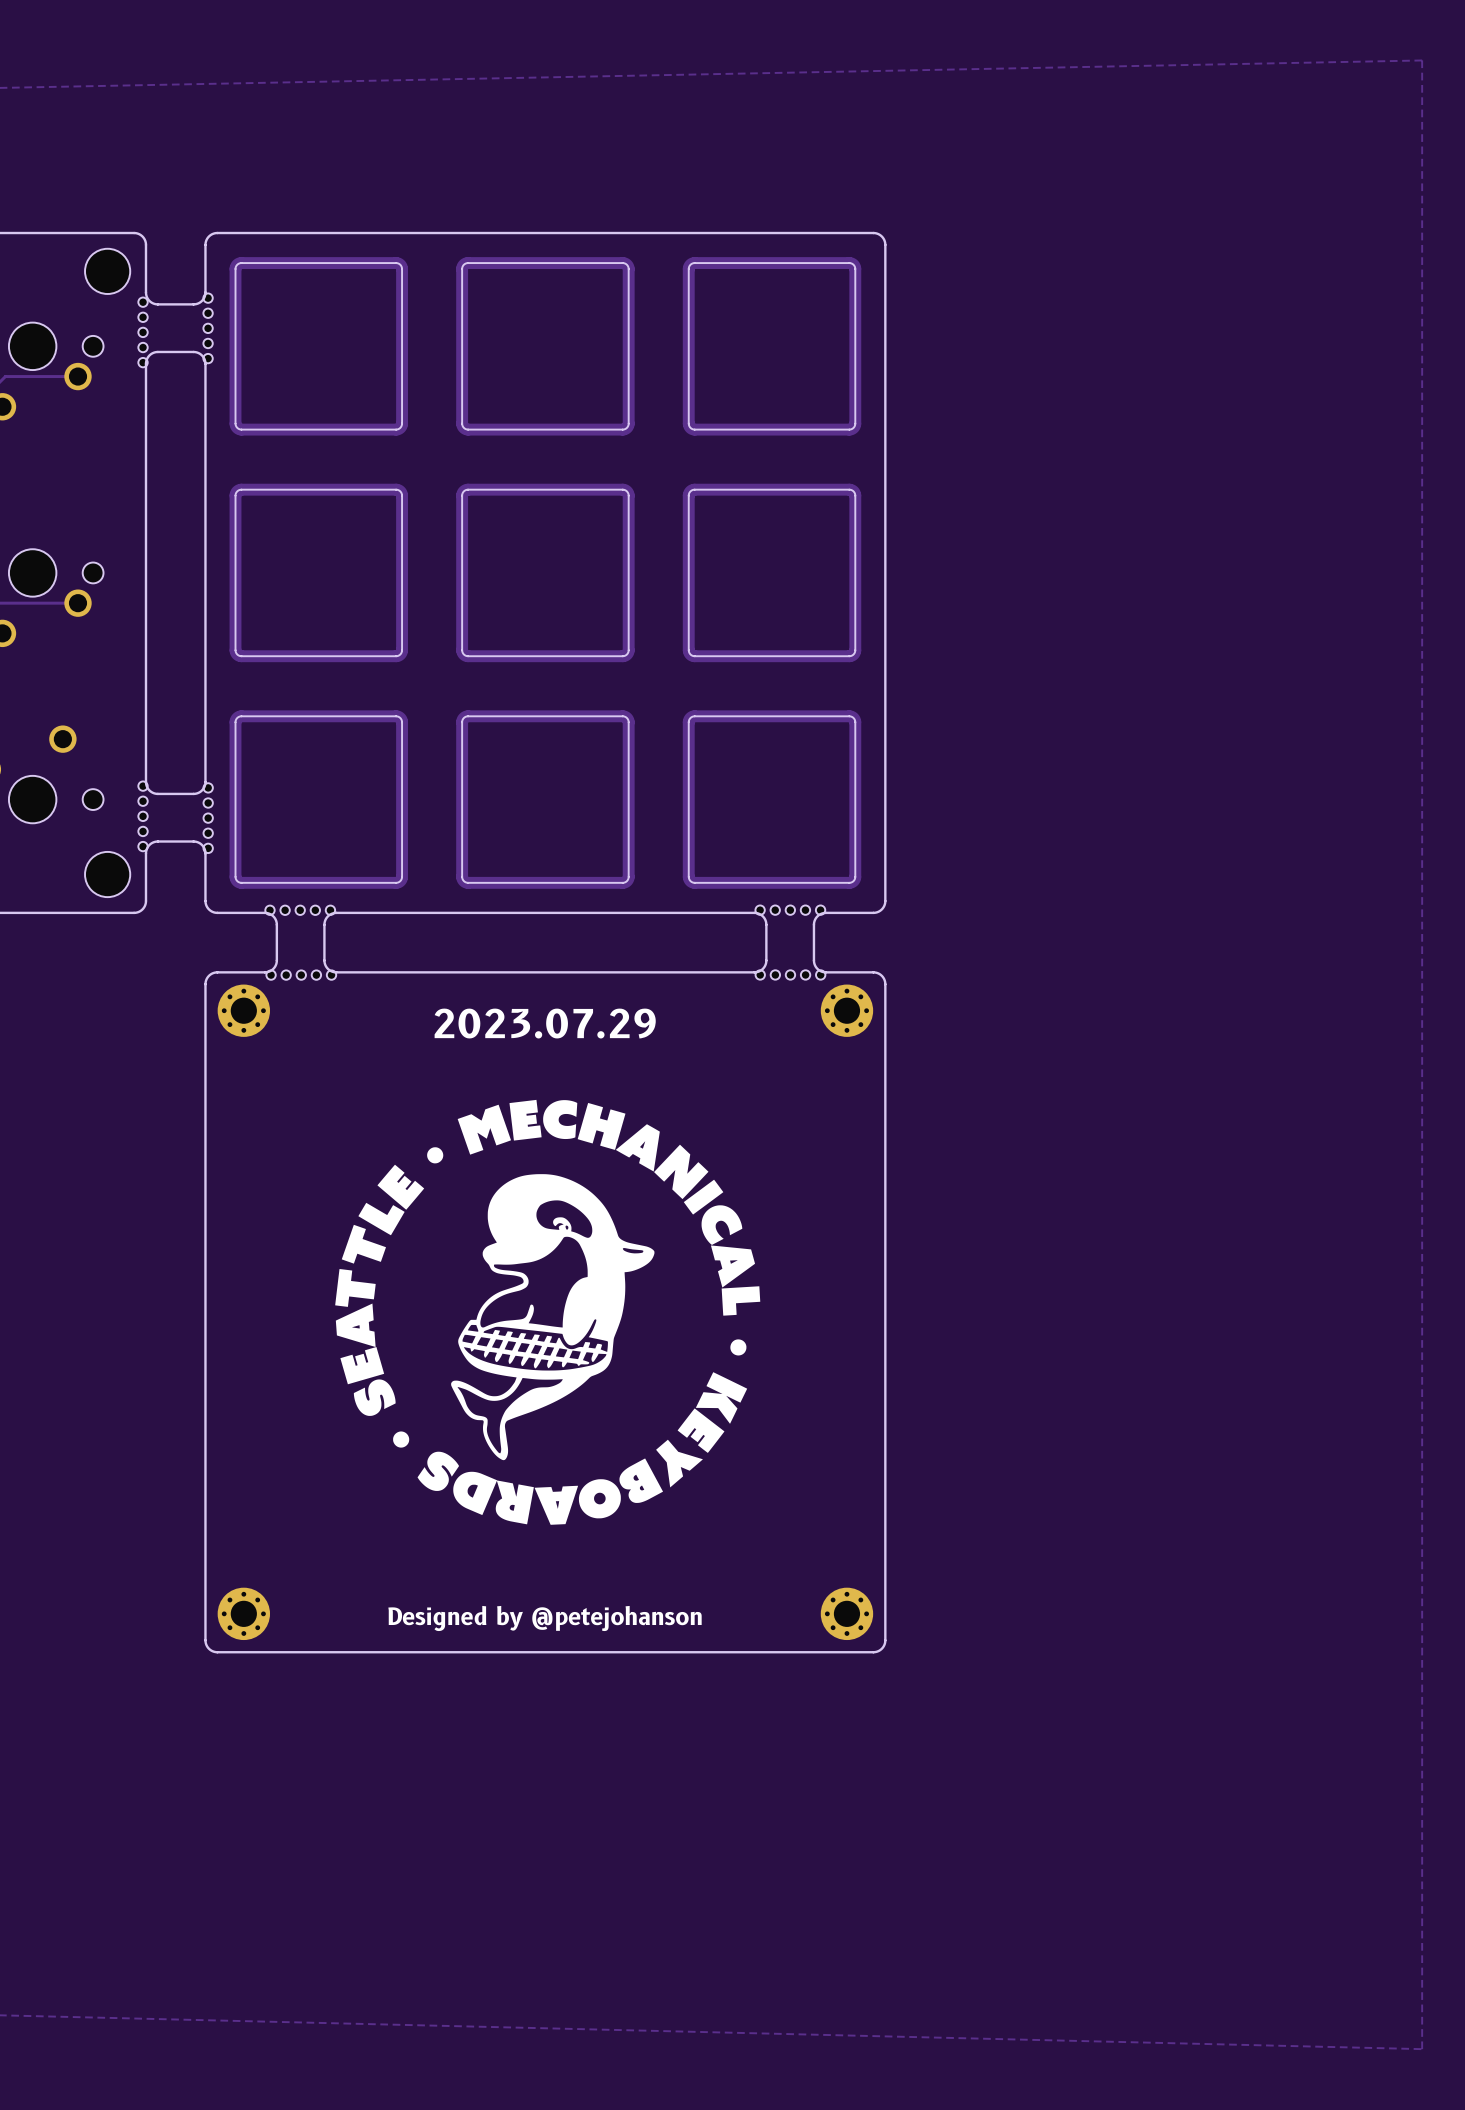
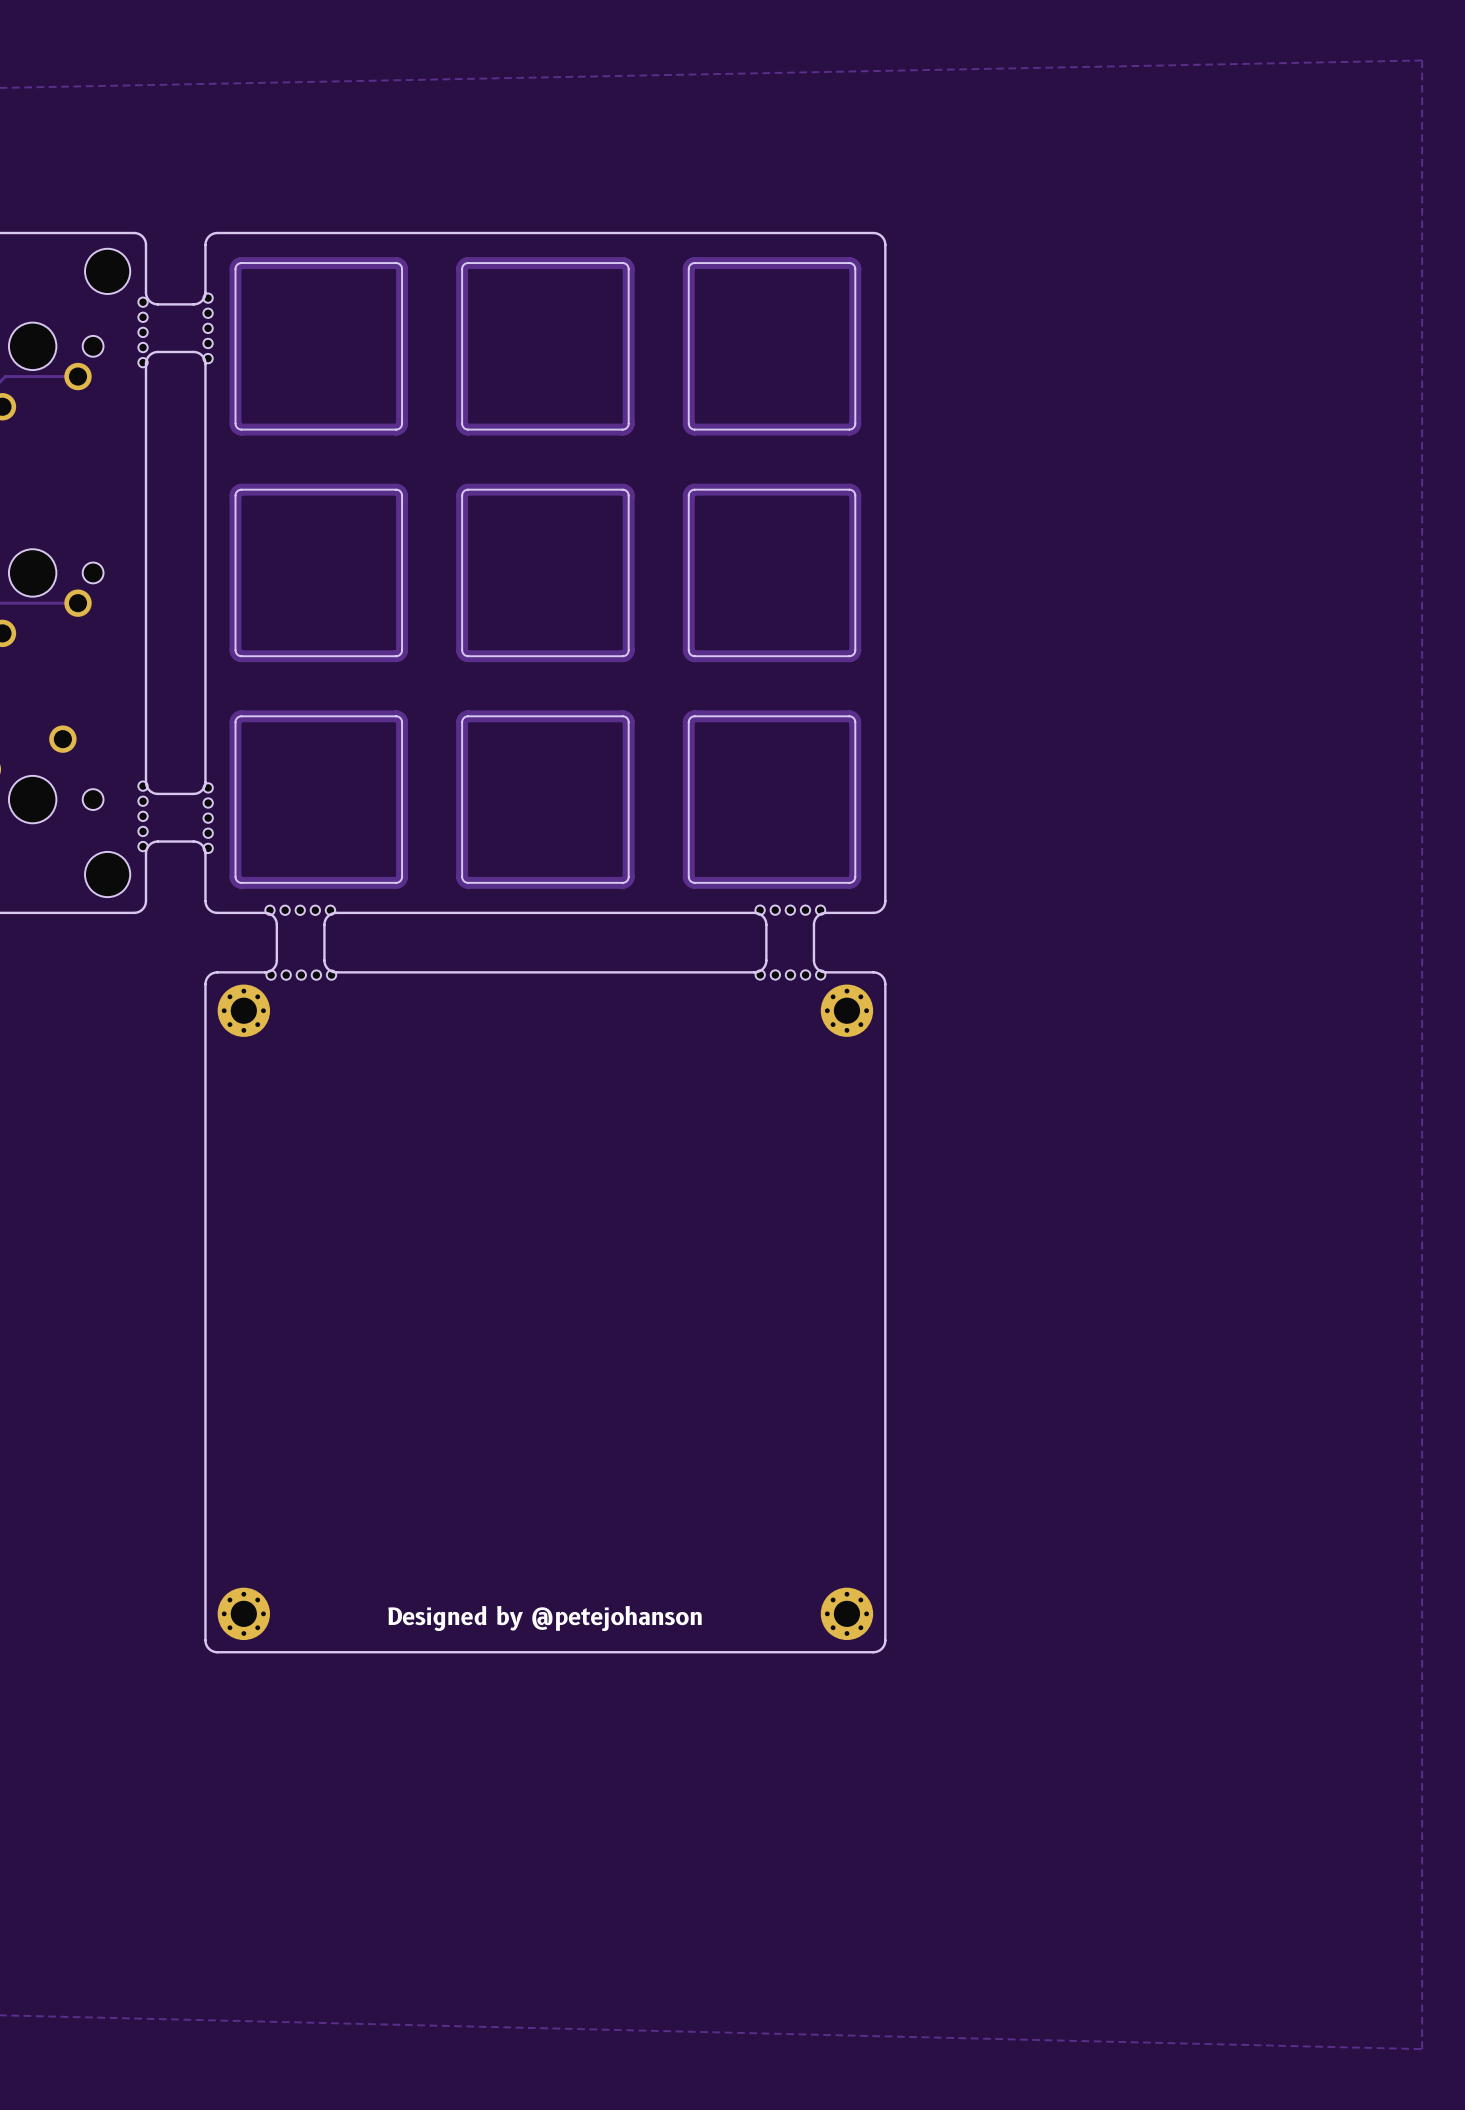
text: 2023.07.29 (545, 1023) -> none
drawing: [335, 1099, 761, 1525] -> none

